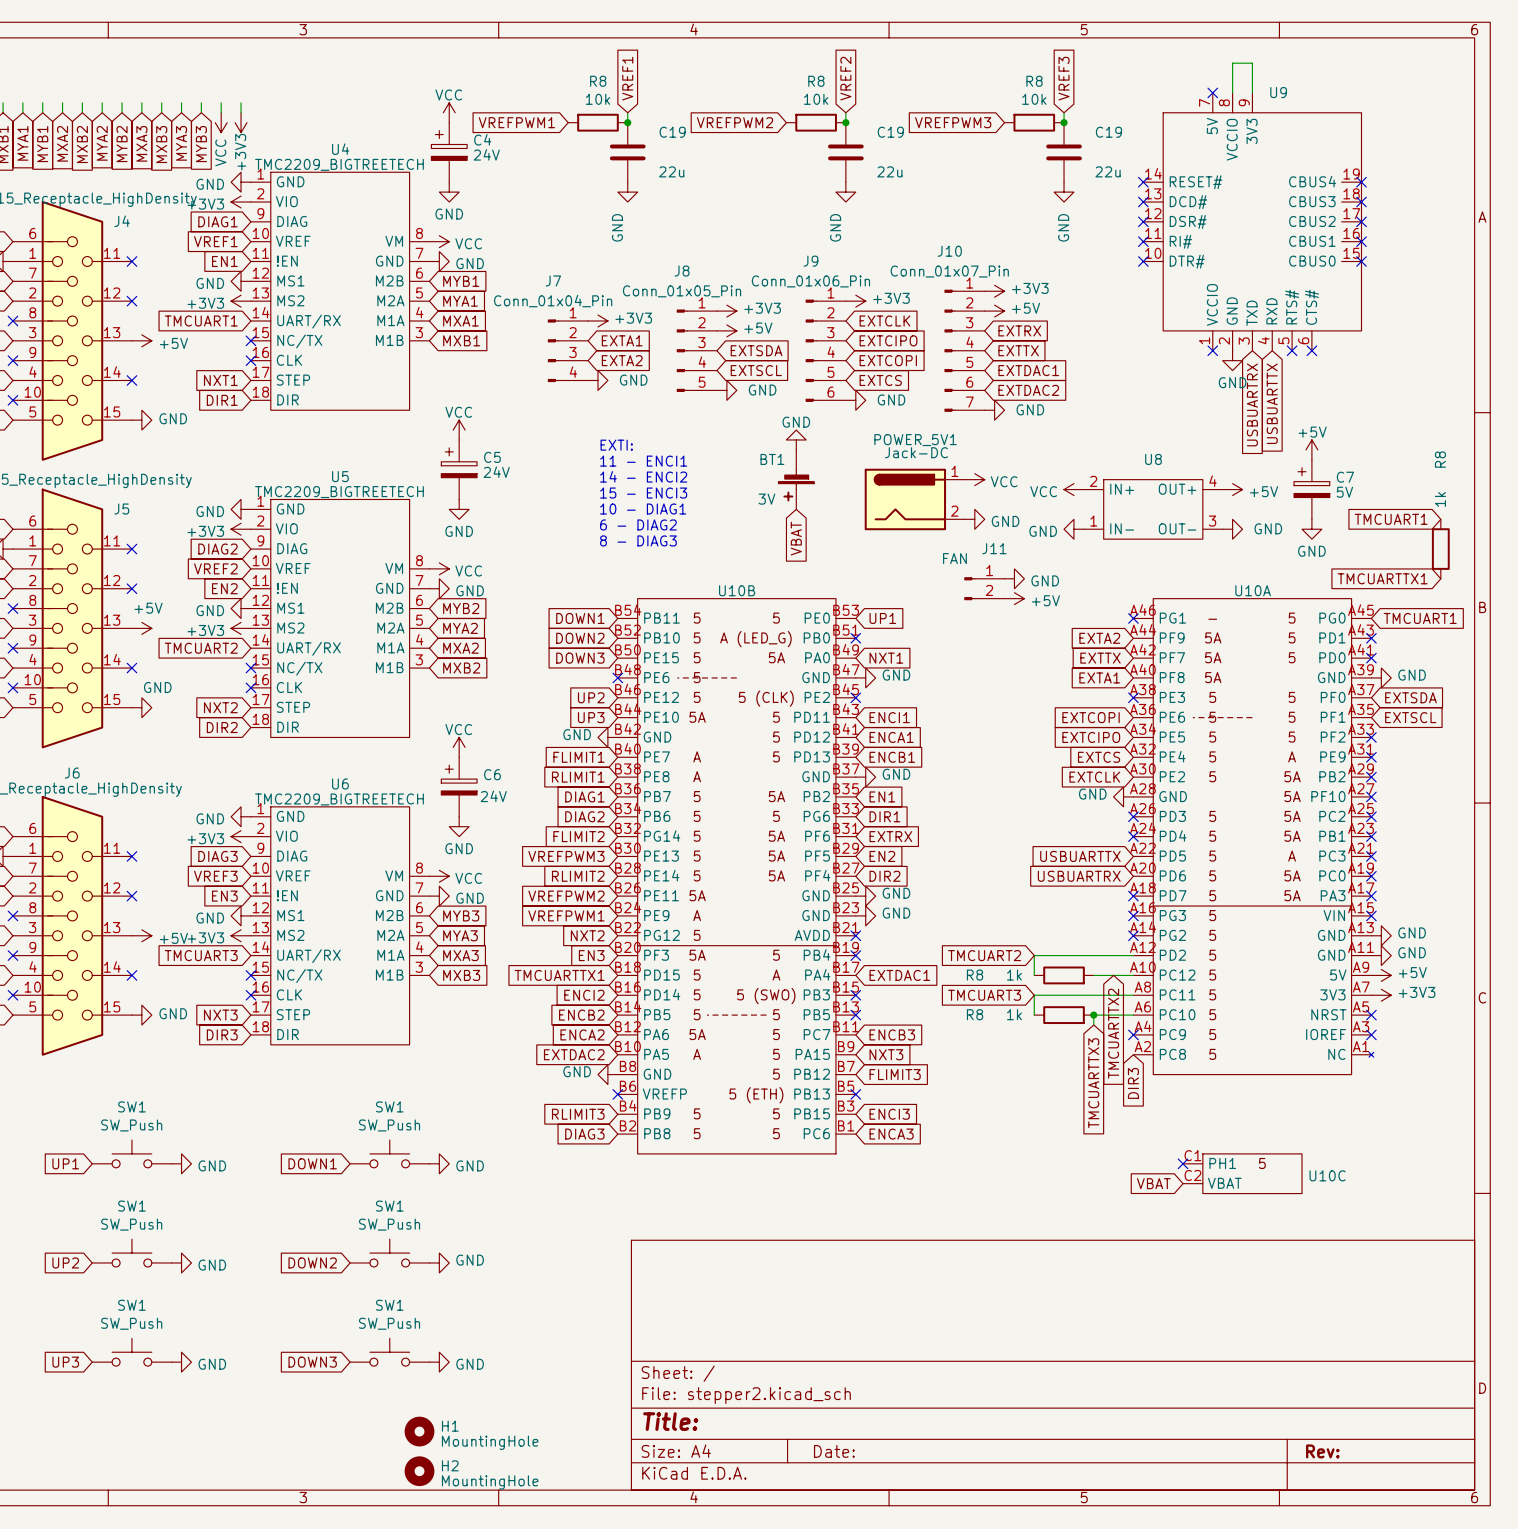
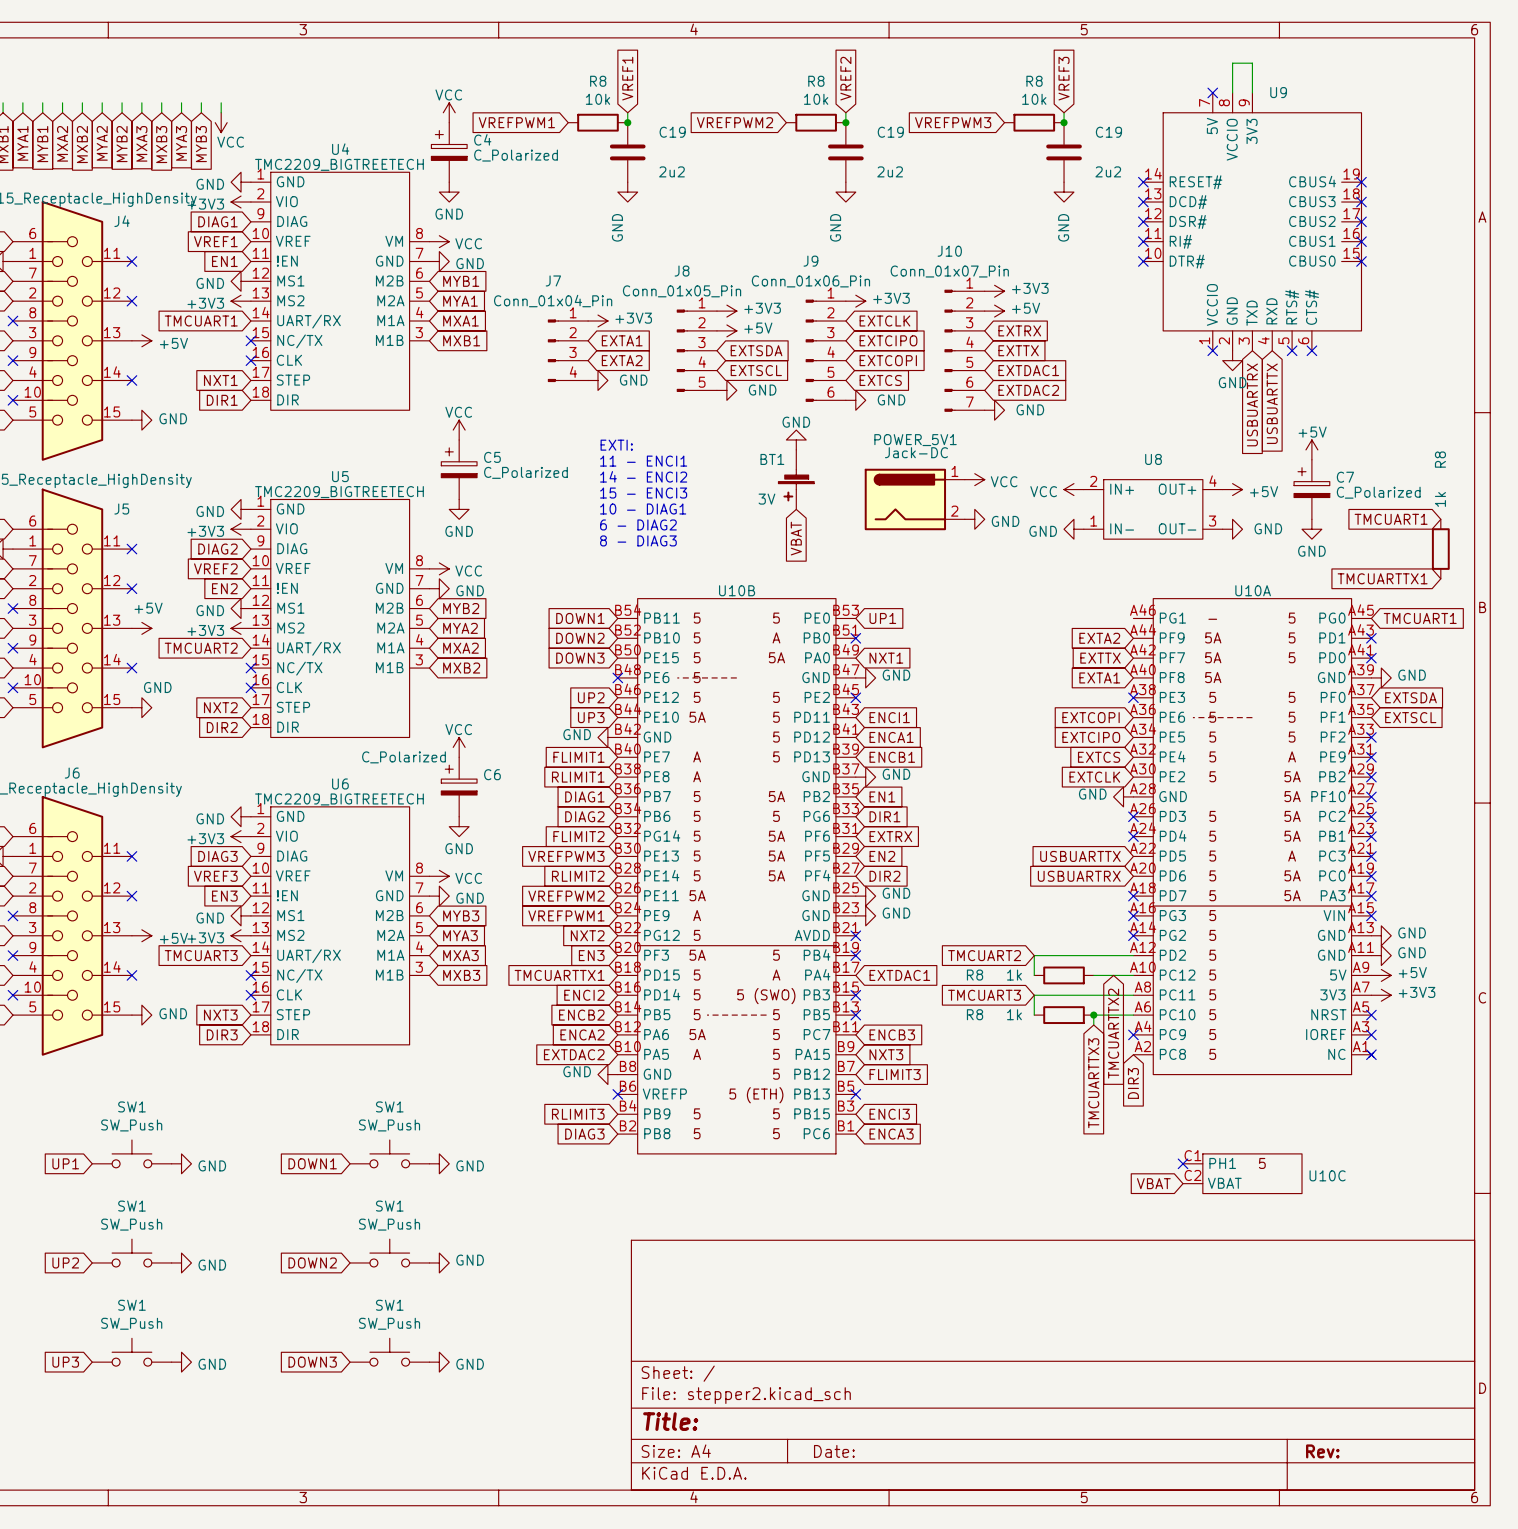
wire: (241, 102) (241, 112) -> none
power symbol: +3V3 (241, 122) -> none
power symbol text rotation: 0° (220, 152) -> 90° clockwise (230, 142)
C4 value: 24V (486, 154) -> C_Polarized (516, 155)
C19 value: 22u (671, 171) -> 2u2 (671, 171)
C19 value: 22u (889, 171) -> 2u2 (890, 171)
C19 value: 22u (1108, 171) -> 2u2 (1108, 171)
C5 value: 24V (496, 472) -> C_Polarized (525, 472)
C7 value: 5V (1344, 492) -> C_Polarized (1378, 492)
power symbol: GND (1014, 578) -> none
J11: FAN (984, 588) -> none
power symbol: +5V (1014, 598) -> none
no-connect mark: (1133, 618) -> none
U10B text: none -> A (776, 637)
U10B text: A (LED_G) (755, 639) -> none
U10B text: none -> 5 (776, 697)
U10B text: 5 (CLK) (766, 698) -> none
C6 value: 24V (493, 796) -> C_Polarized (404, 757)
no-connect mark: none -> (1371, 1054)
H1: MountingHole (419, 1431) -> none
H2: MountingHole (419, 1471) -> none

